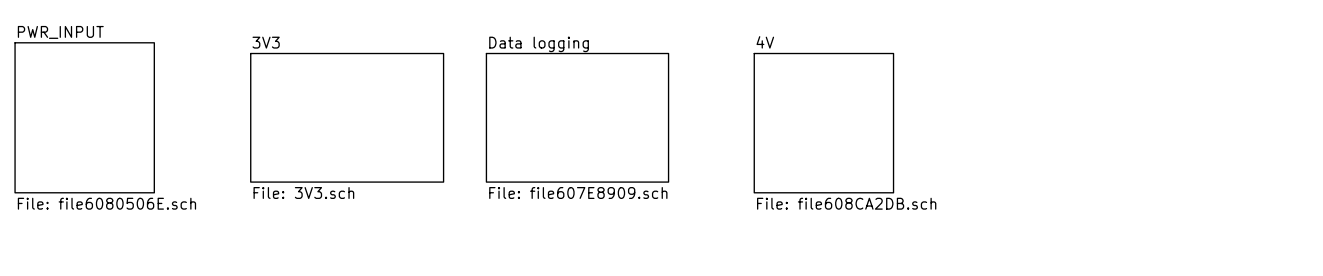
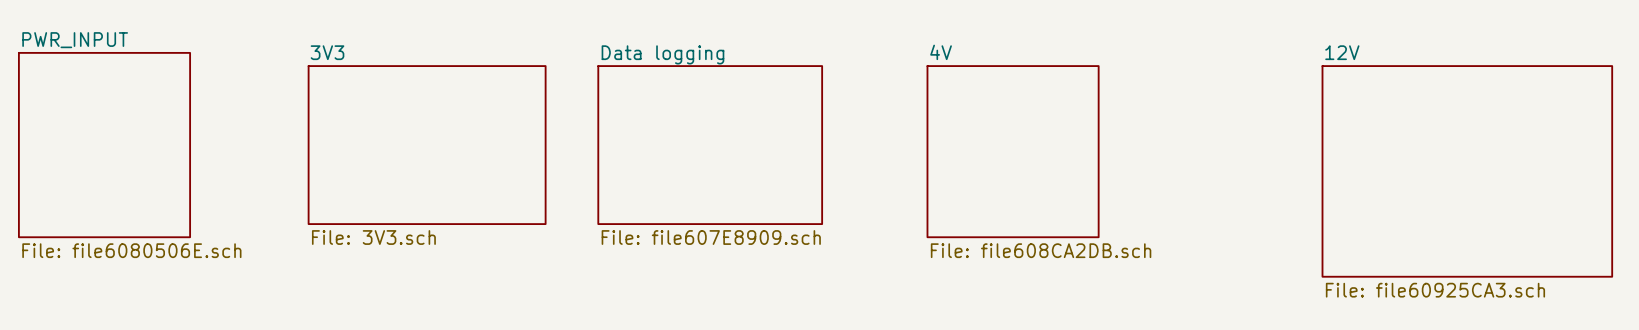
sheet 12V: none -> File: file60925CA3.sch (1467, 171)

